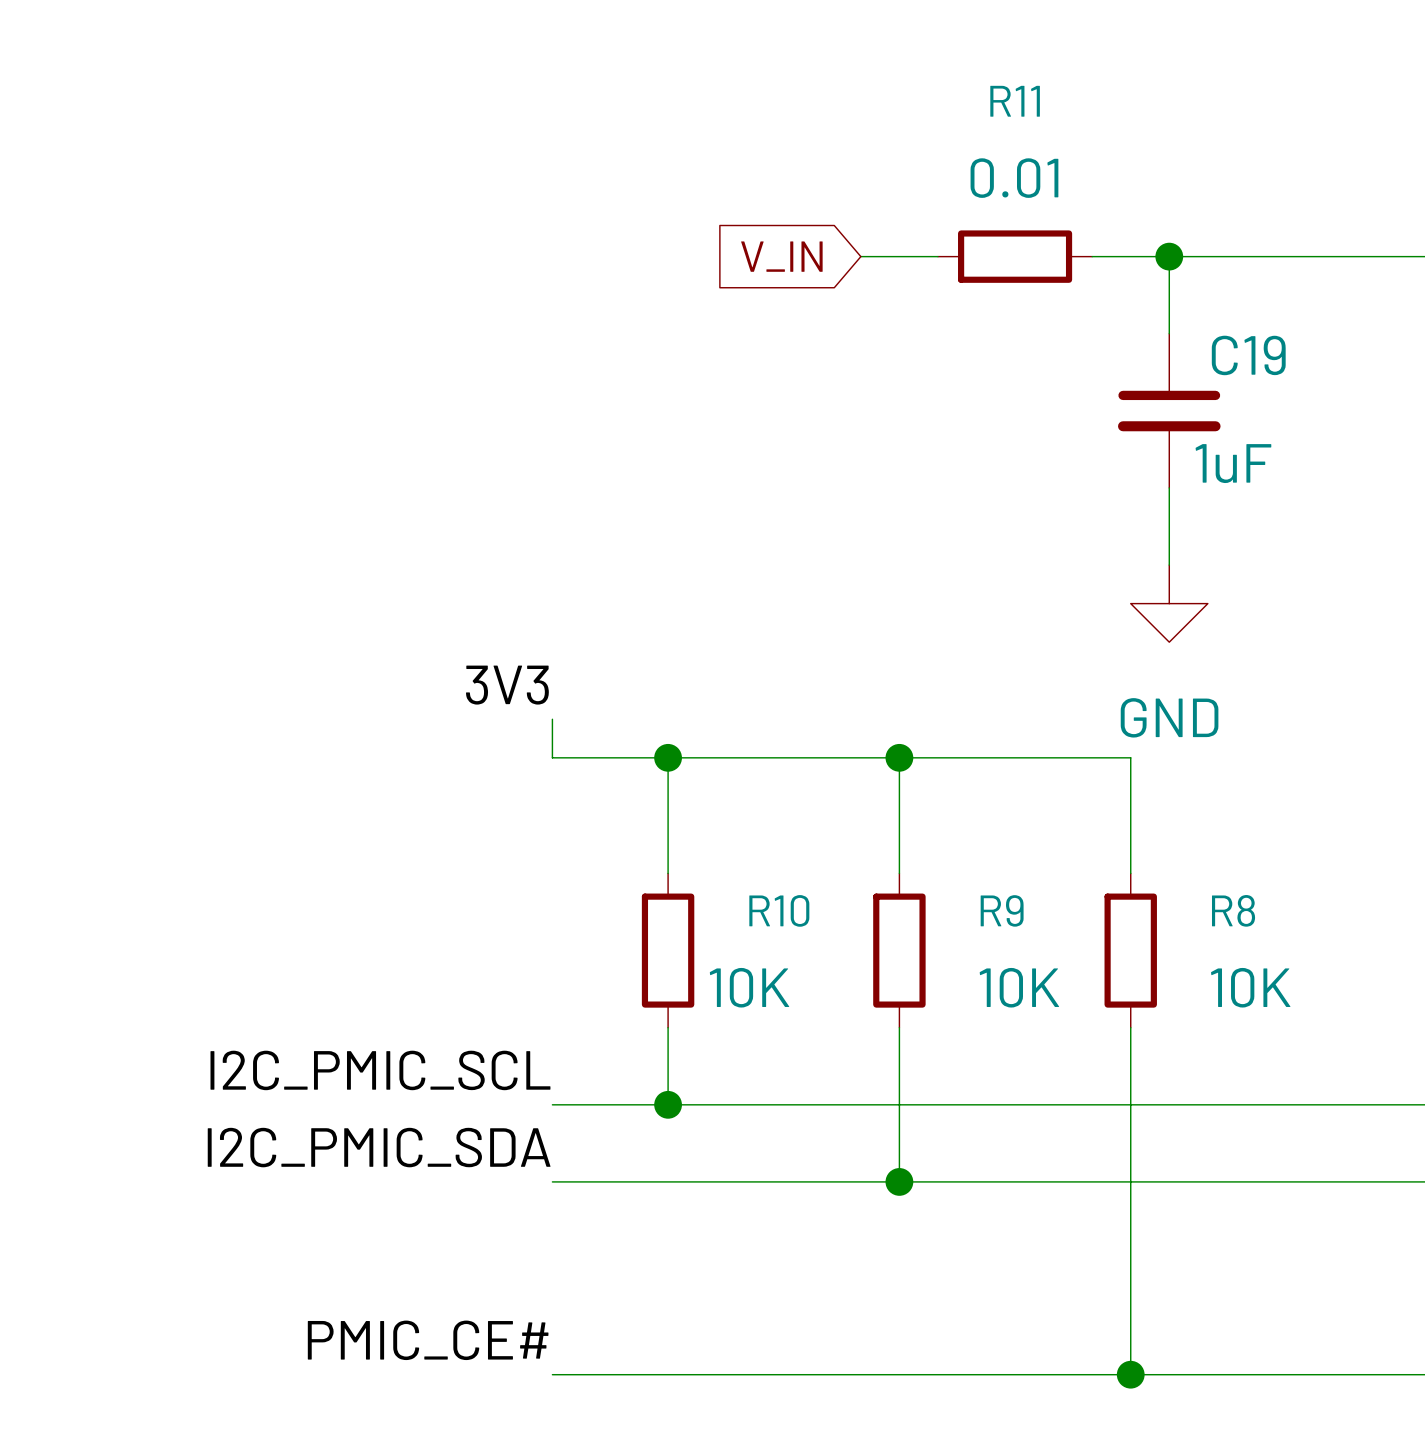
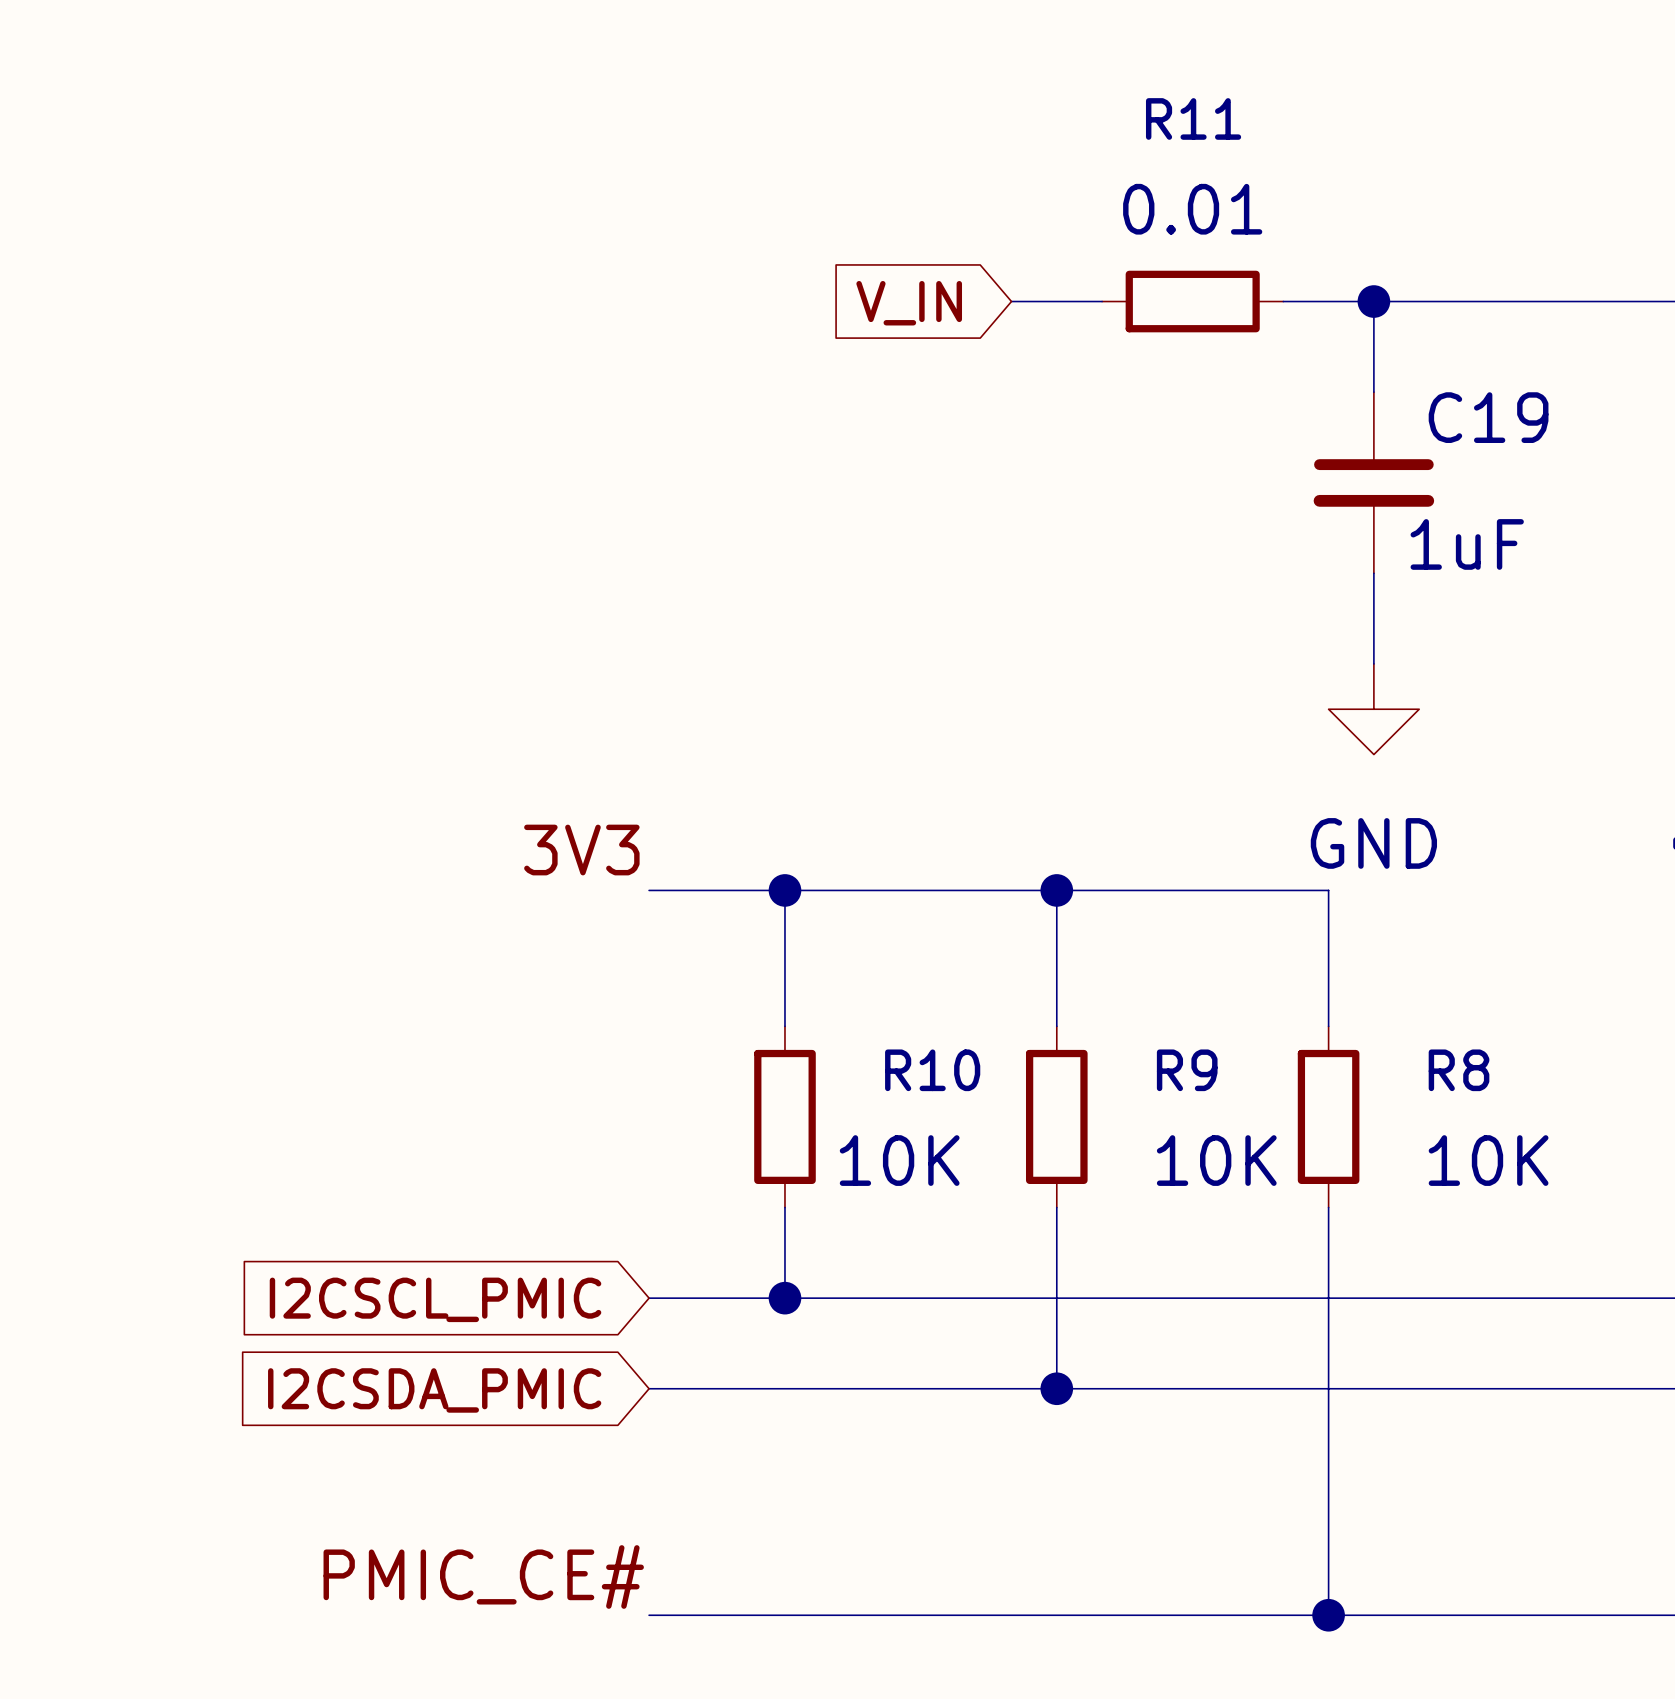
label position: 3V3 (507, 685) -> 3V3 (581, 850)
wire: (552, 719) (552, 757) -> none
label: I2C_PMIC_SCL (380, 1070) -> none
global label: none -> I2CSCL_PMIC (435, 1299)
label: I2C_PMIC_SDA (379, 1147) -> none
global label: none -> I2CSDA_PMIC (434, 1390)

